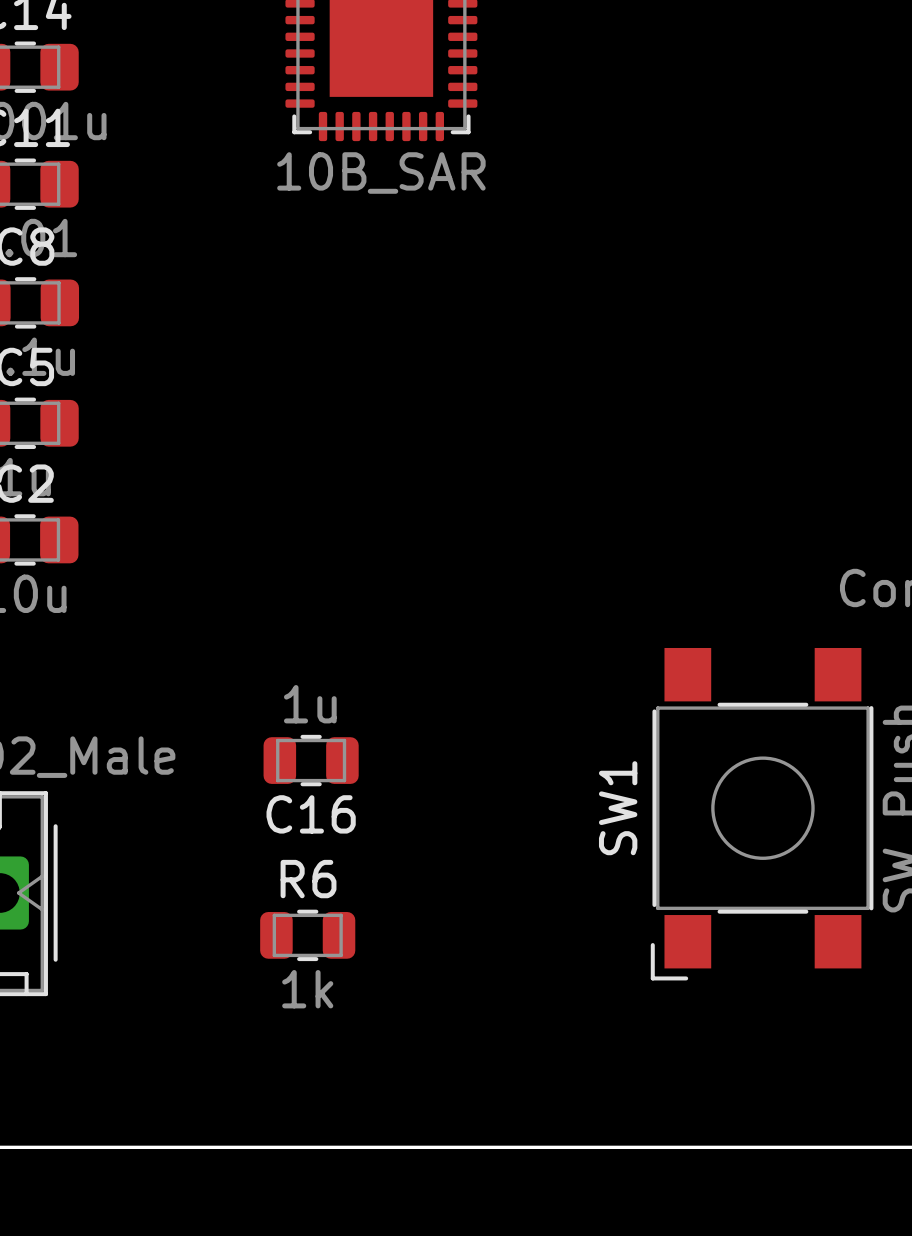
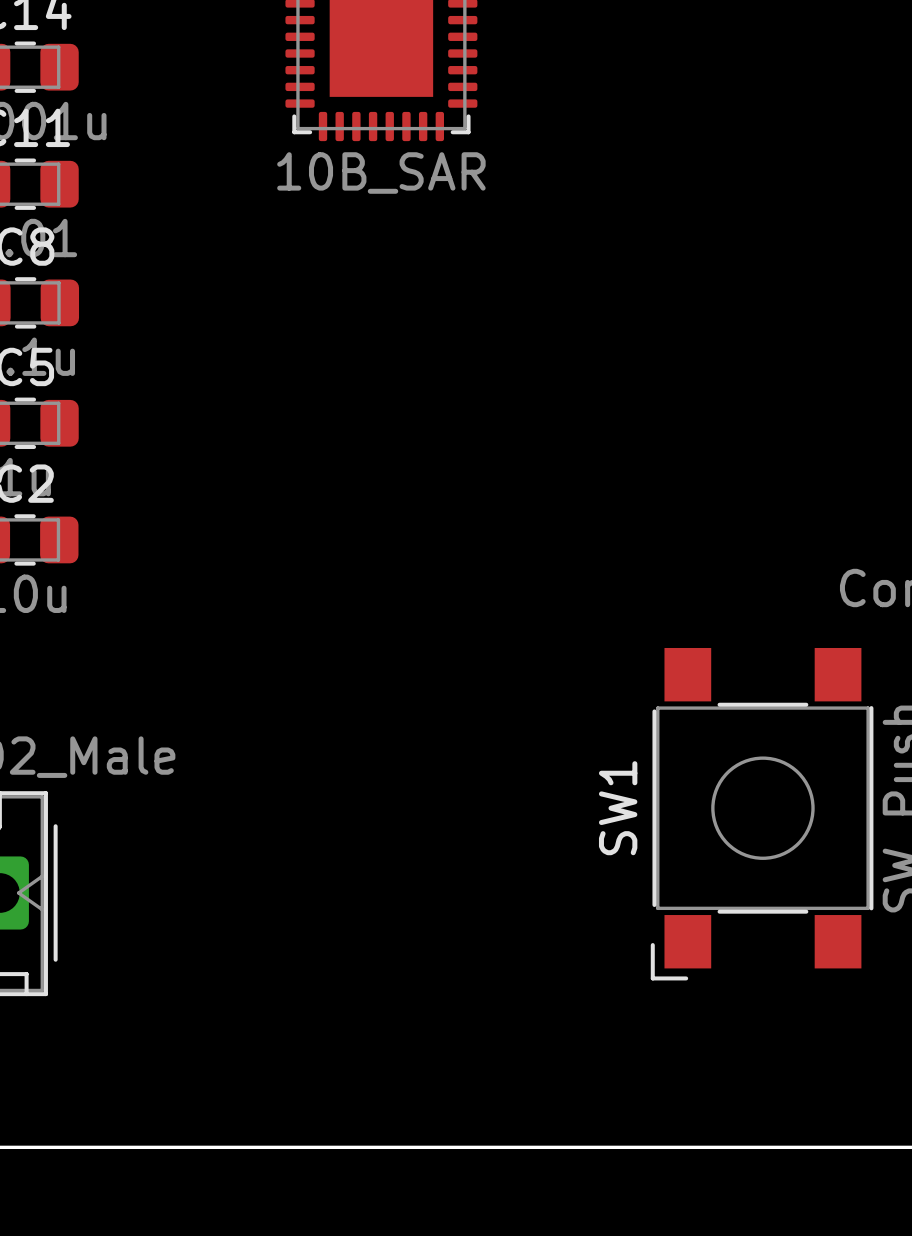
C16: 1u (311, 760) -> none
R6: 1k (307, 935) -> none

